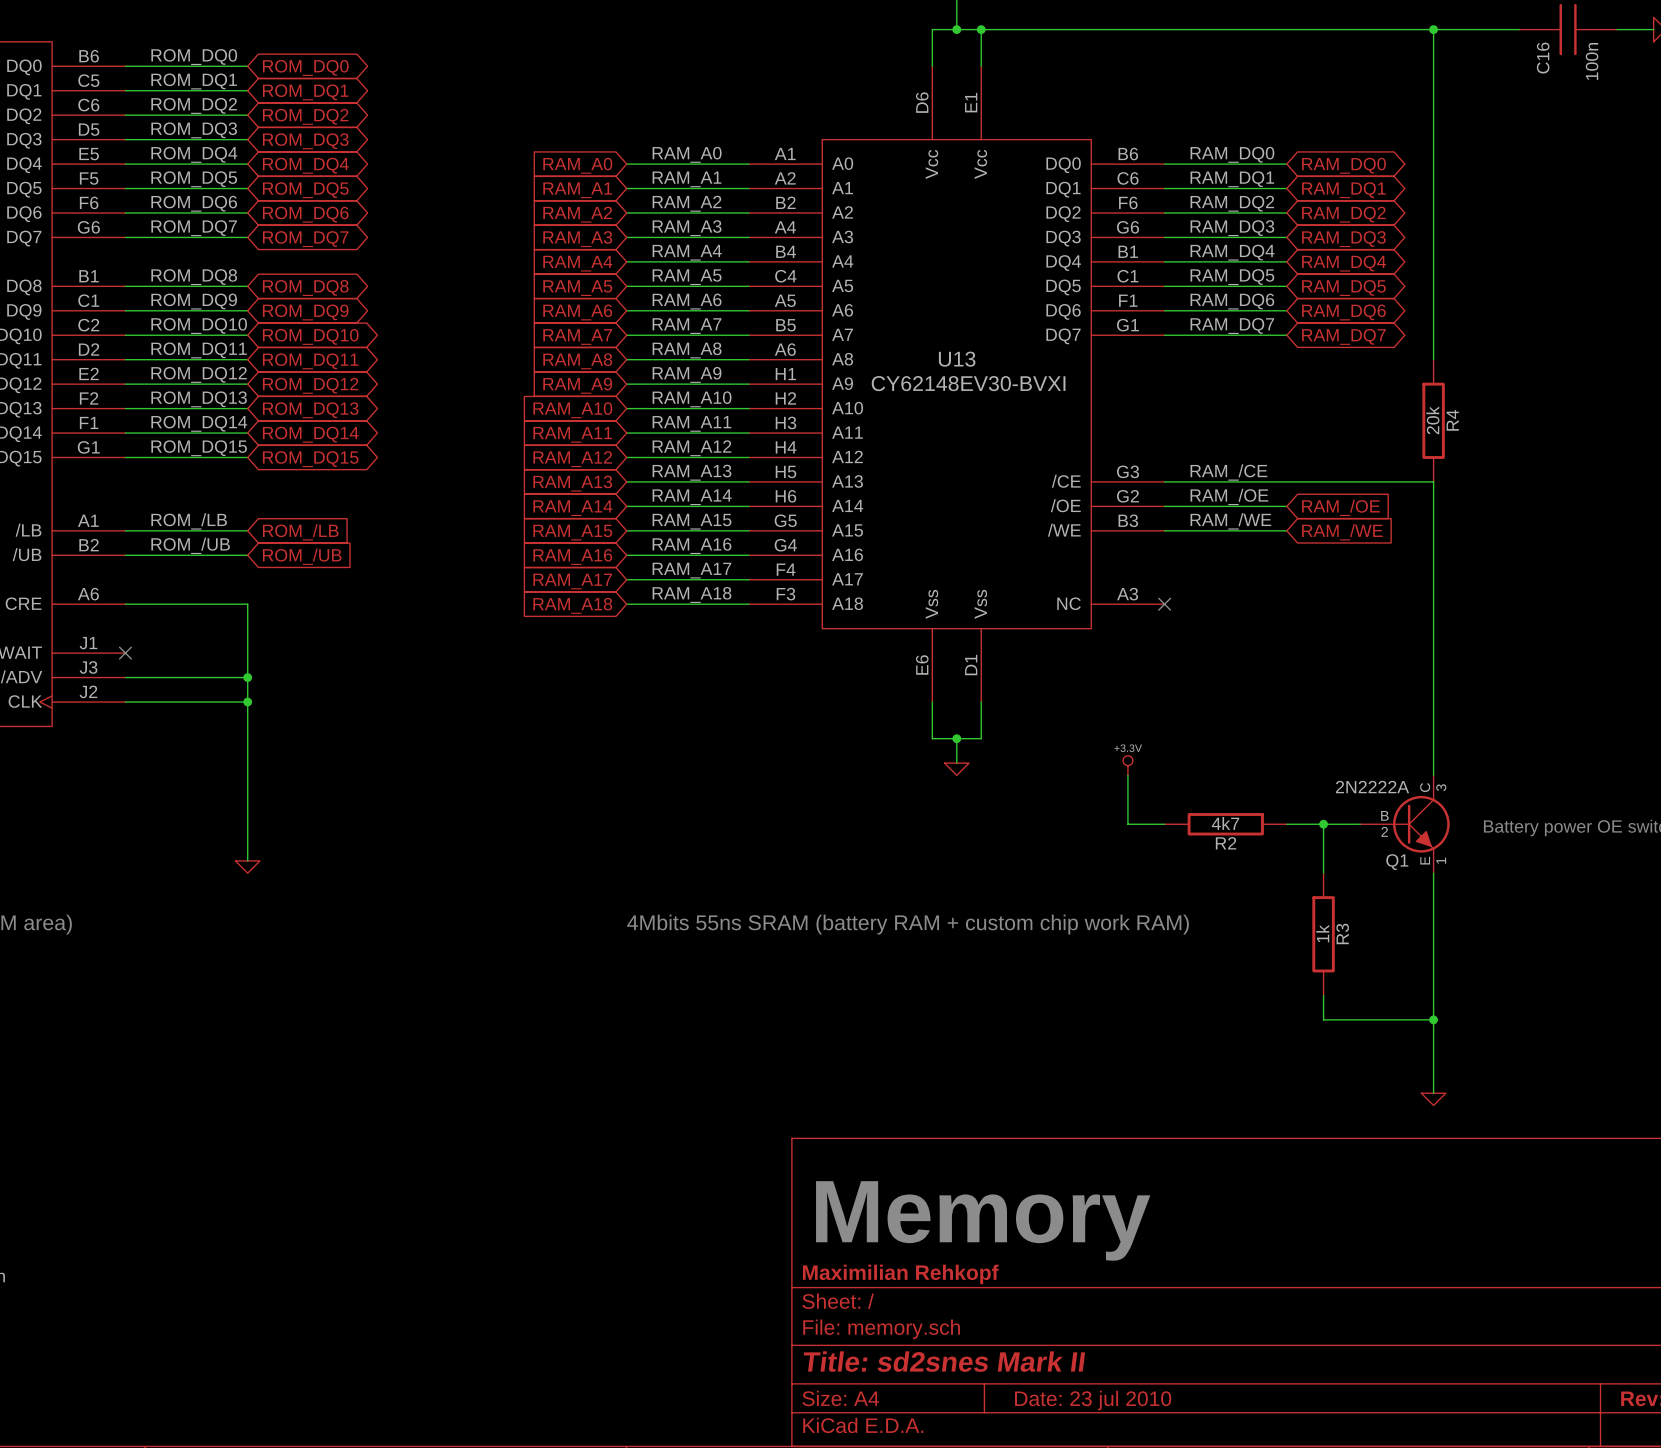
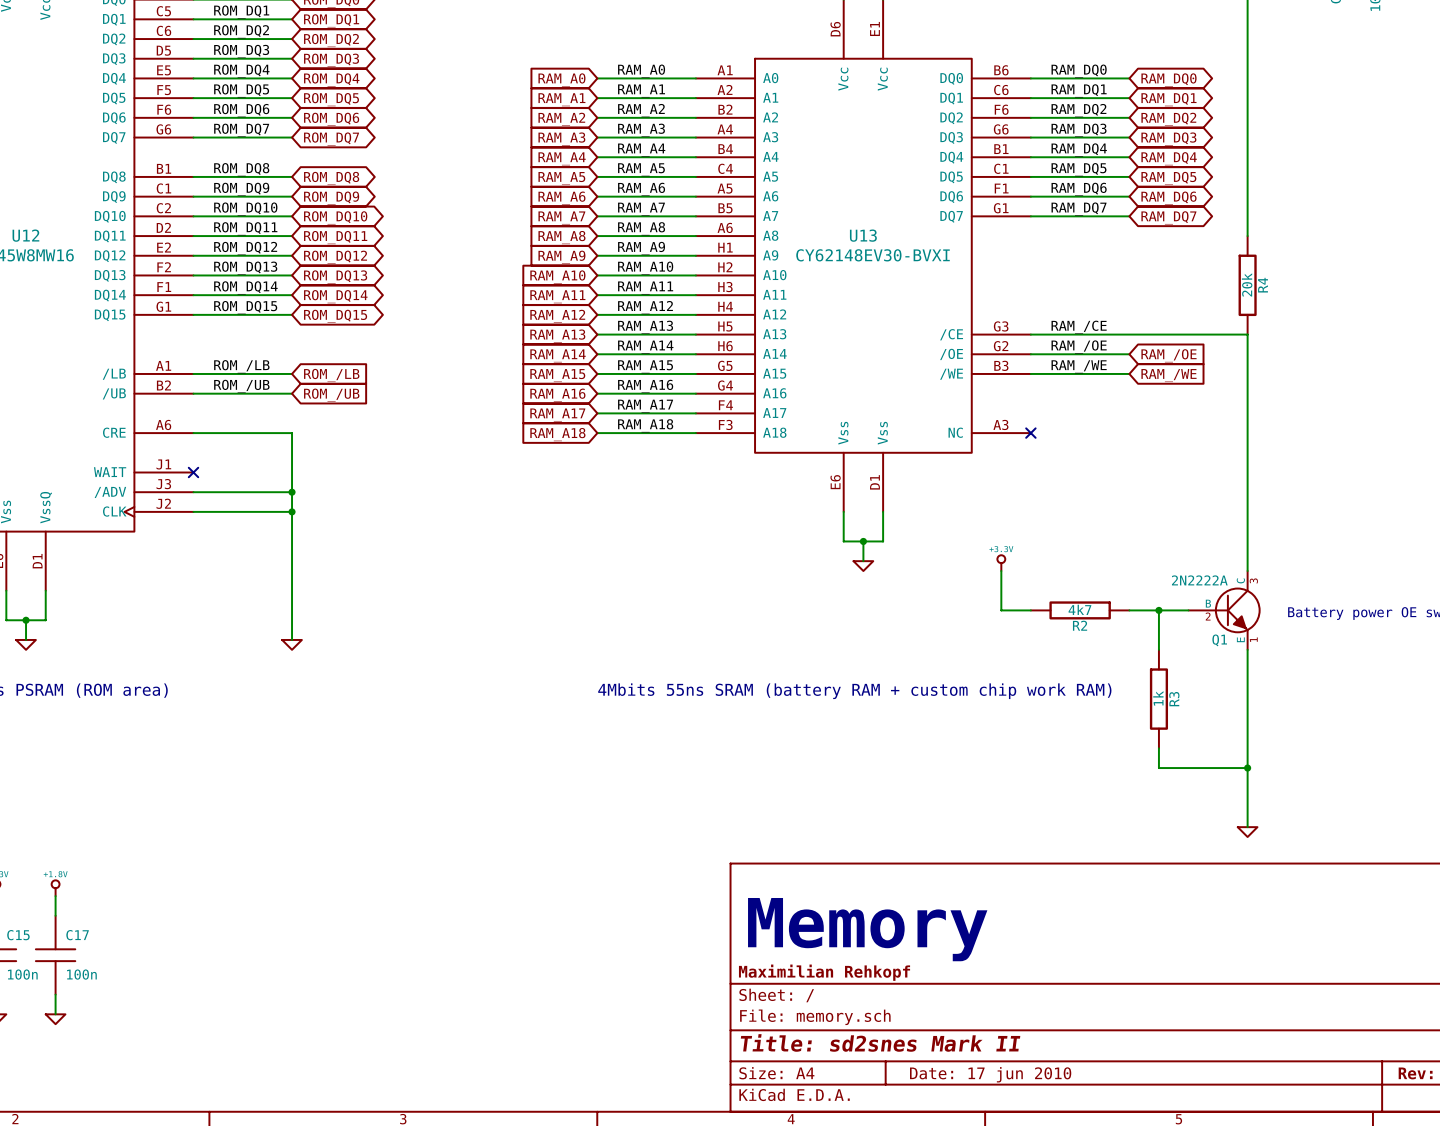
title block: Date: 23 jul 2010 (1093, 1400) -> Date: 17 jun 2010 (990, 1074)

